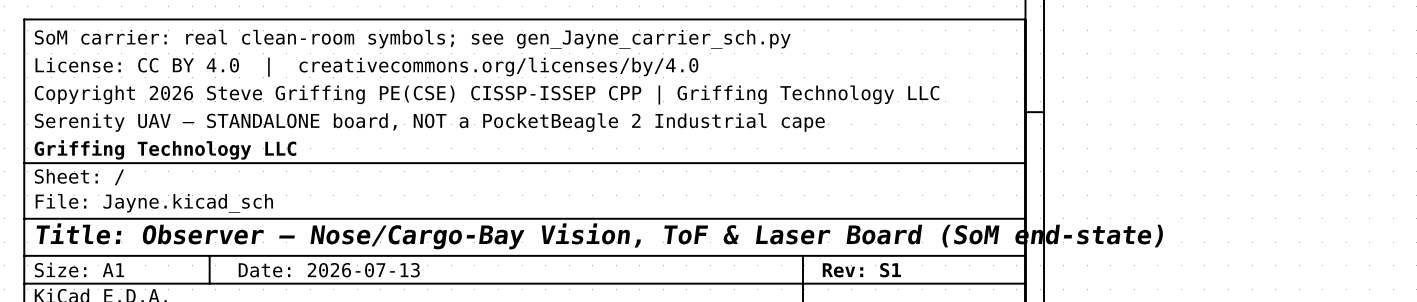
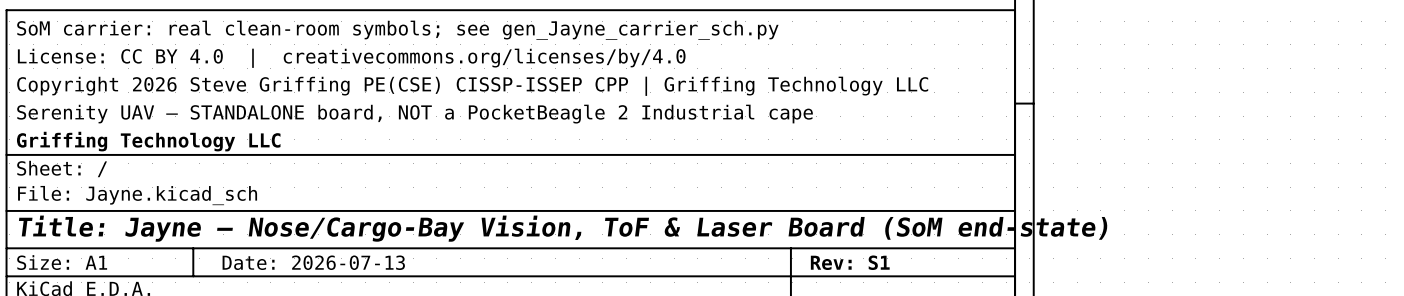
title block: Title: Observer — Nose/Cargo-Bay Vision, ToF & Laser Board (SoM end-state) (599, 236) -> Title: Jayne — Nose/Cargo-Bay Vision, ToF & Laser Board (SoM end-state) (563, 228)

